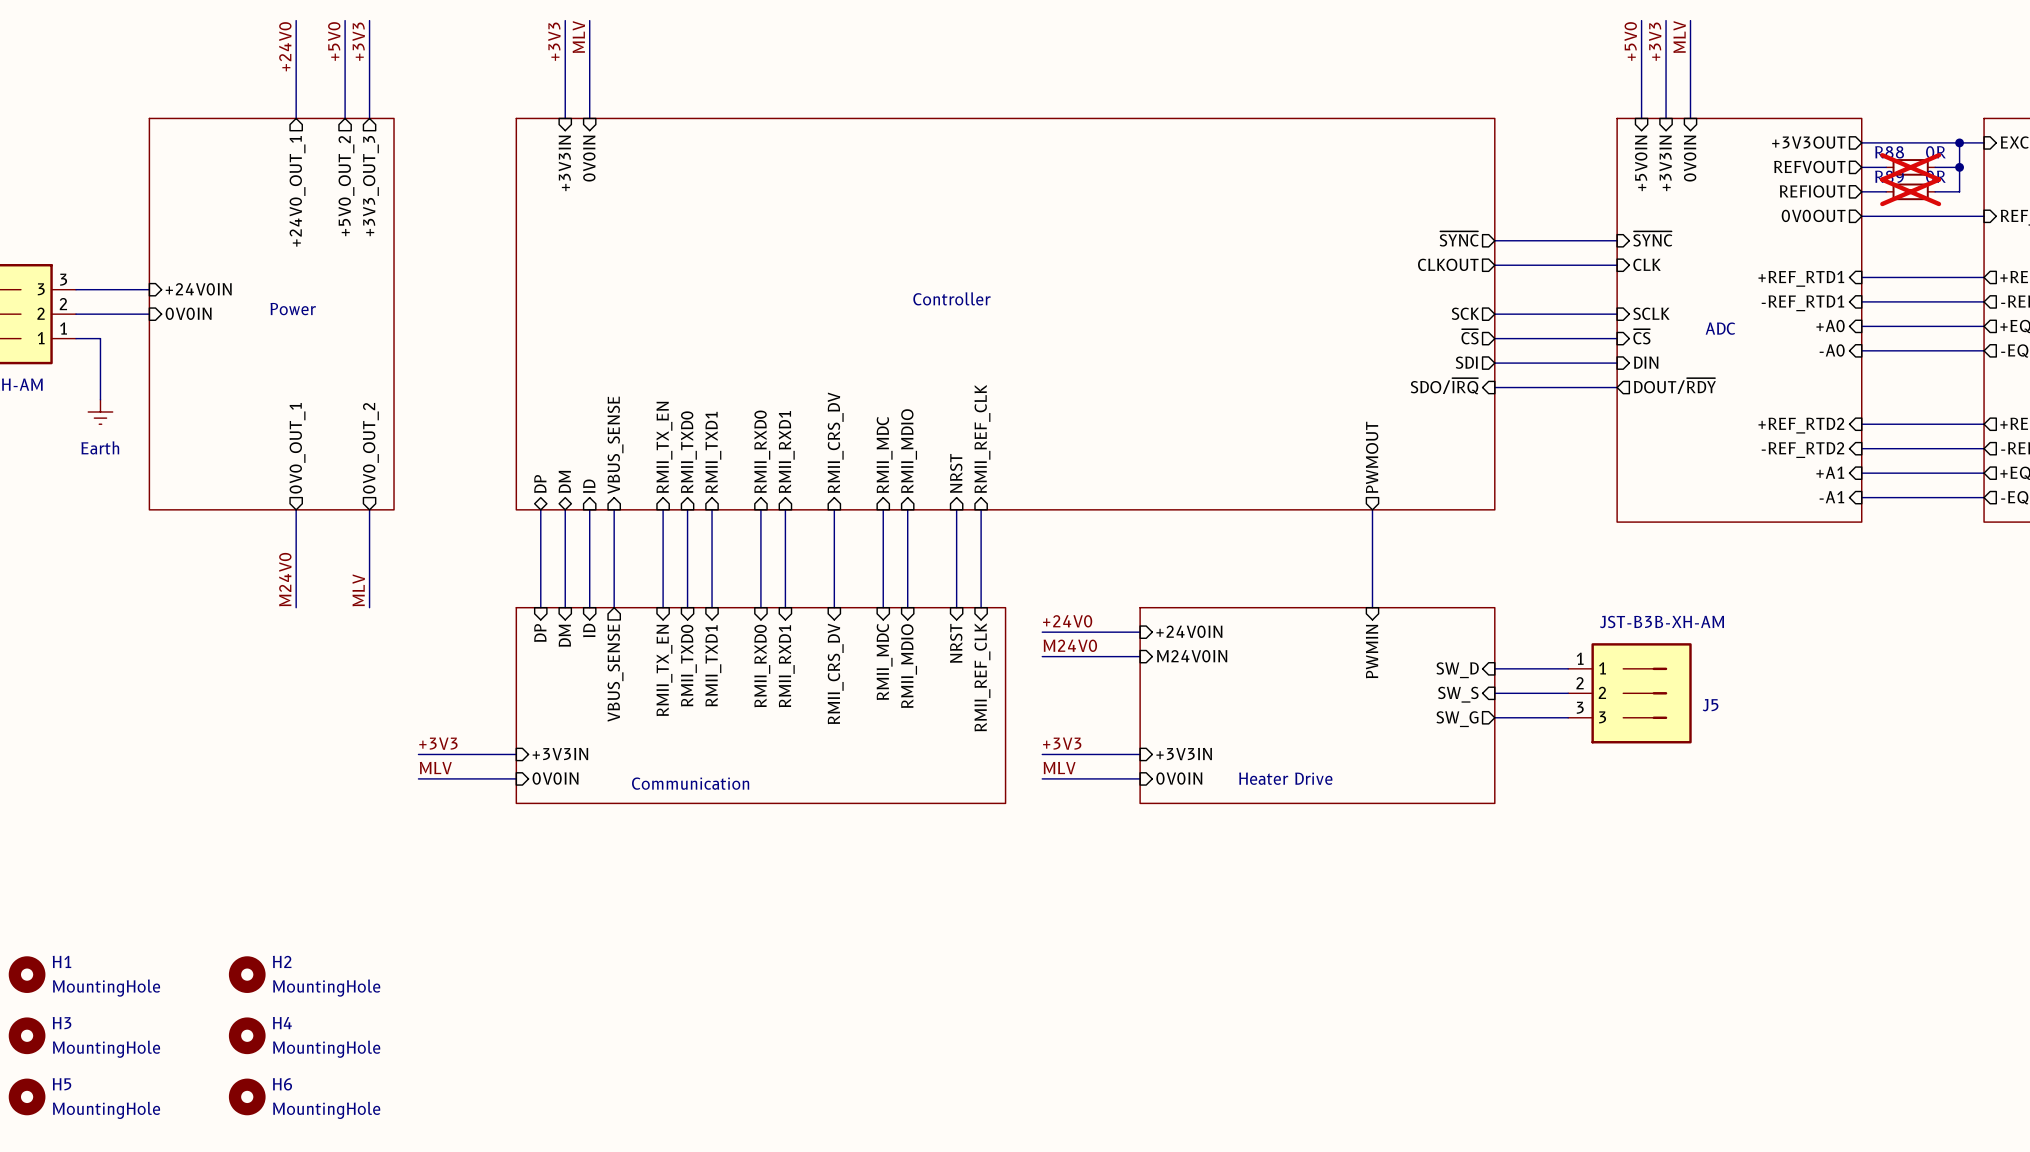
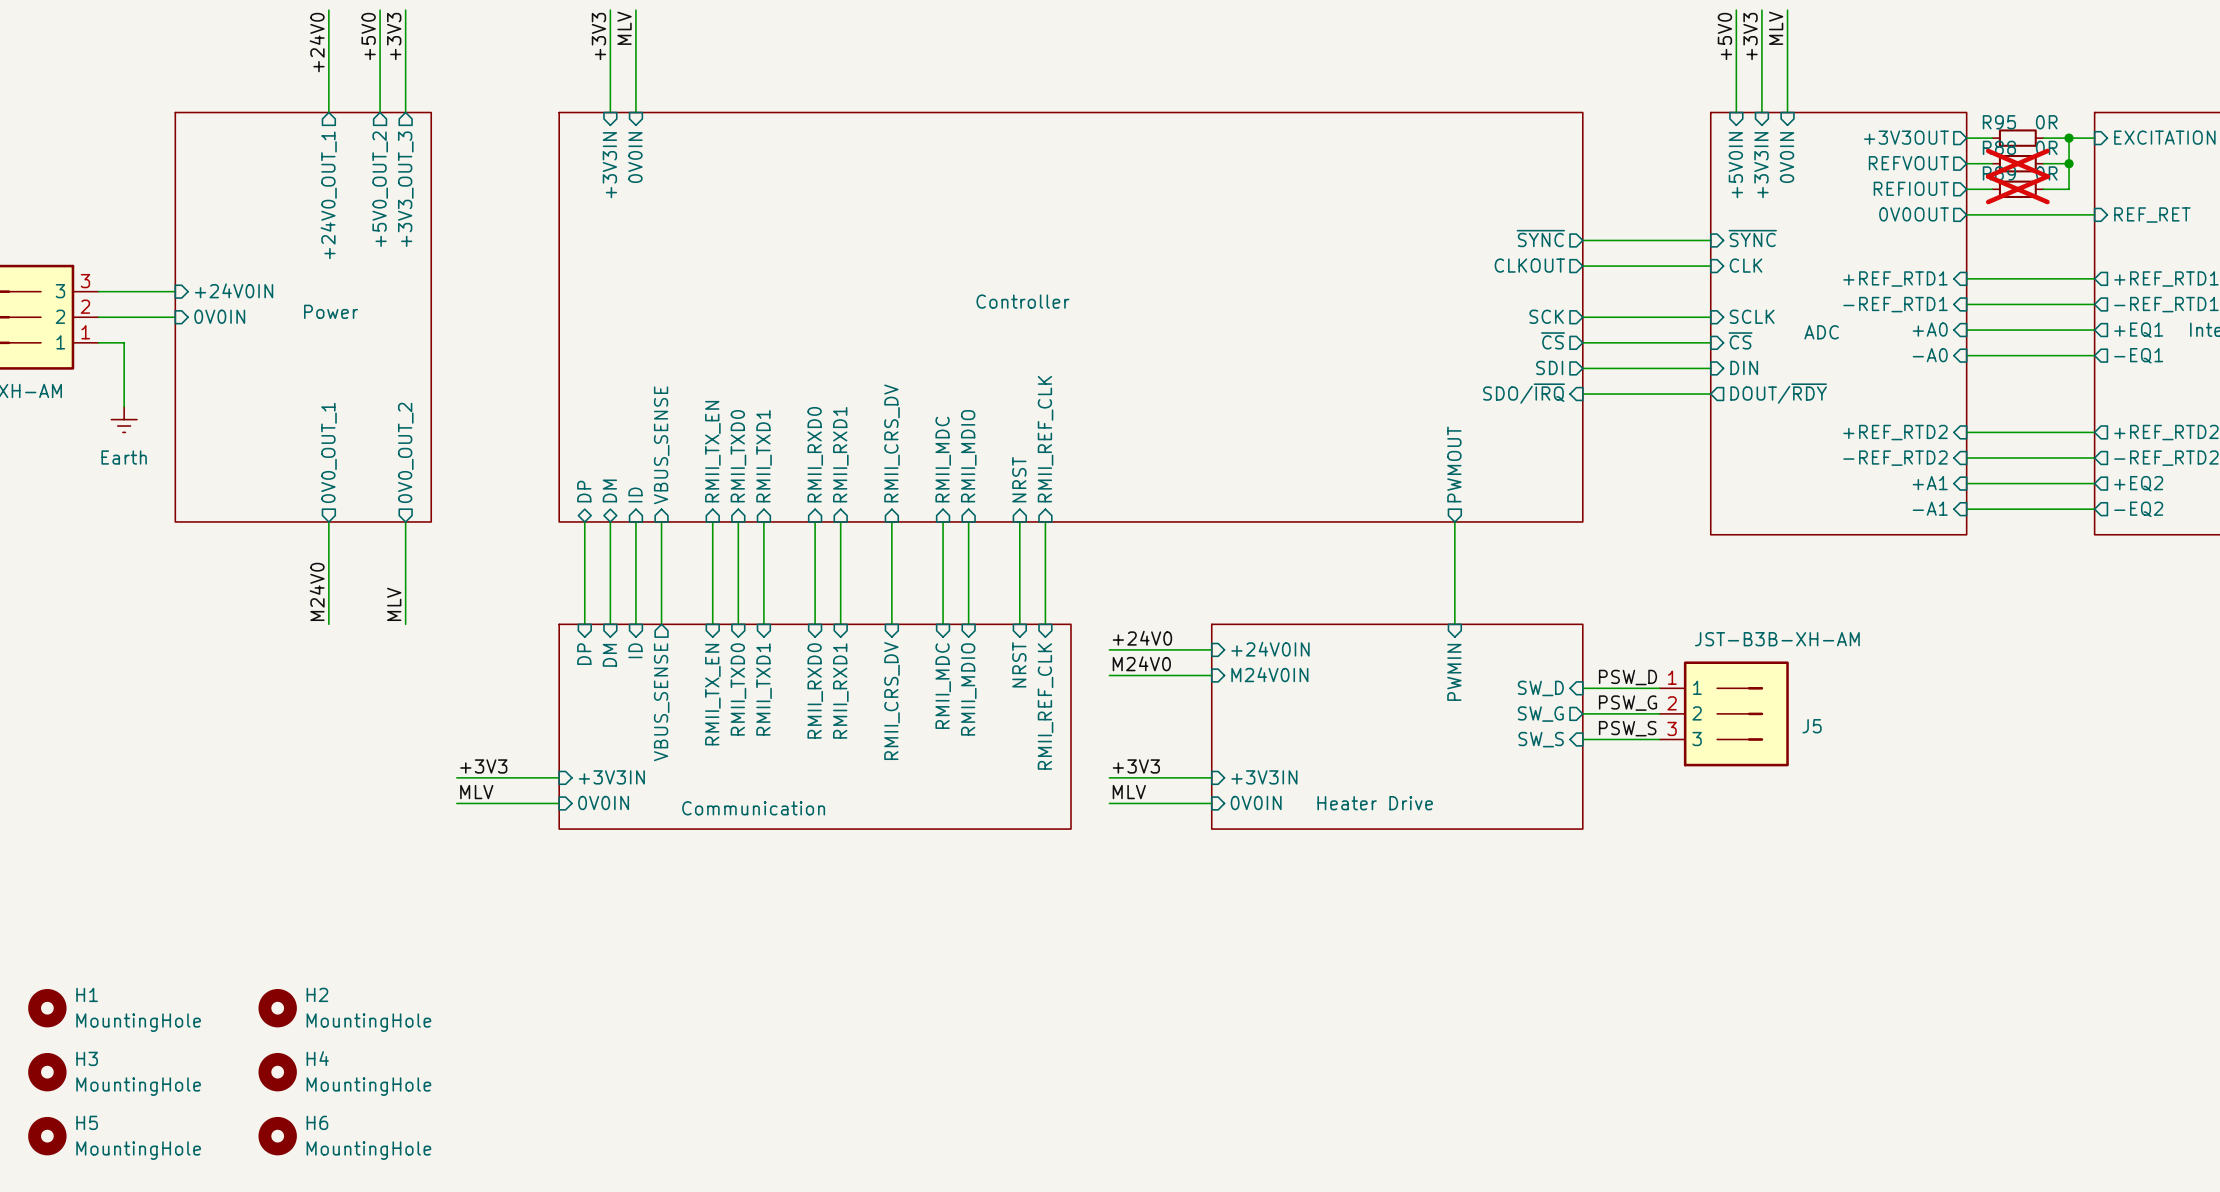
wire: (1886, 142) (1935, 142) -> none
R95: none -> 0R (2017, 138)
label: none -> PSW_D (1627, 677)
label: none -> PSW_G (1627, 703)
sheet pin shape: input (1458, 694) -> output (1540, 714)
sheet pin: SW_S (1458, 694) -> SW_G (1540, 714)
label: none -> PSW_S (1627, 728)
sheet pin shape: output (1457, 719) -> input (1541, 739)
sheet pin: SW_G (1457, 719) -> SW_S (1541, 739)

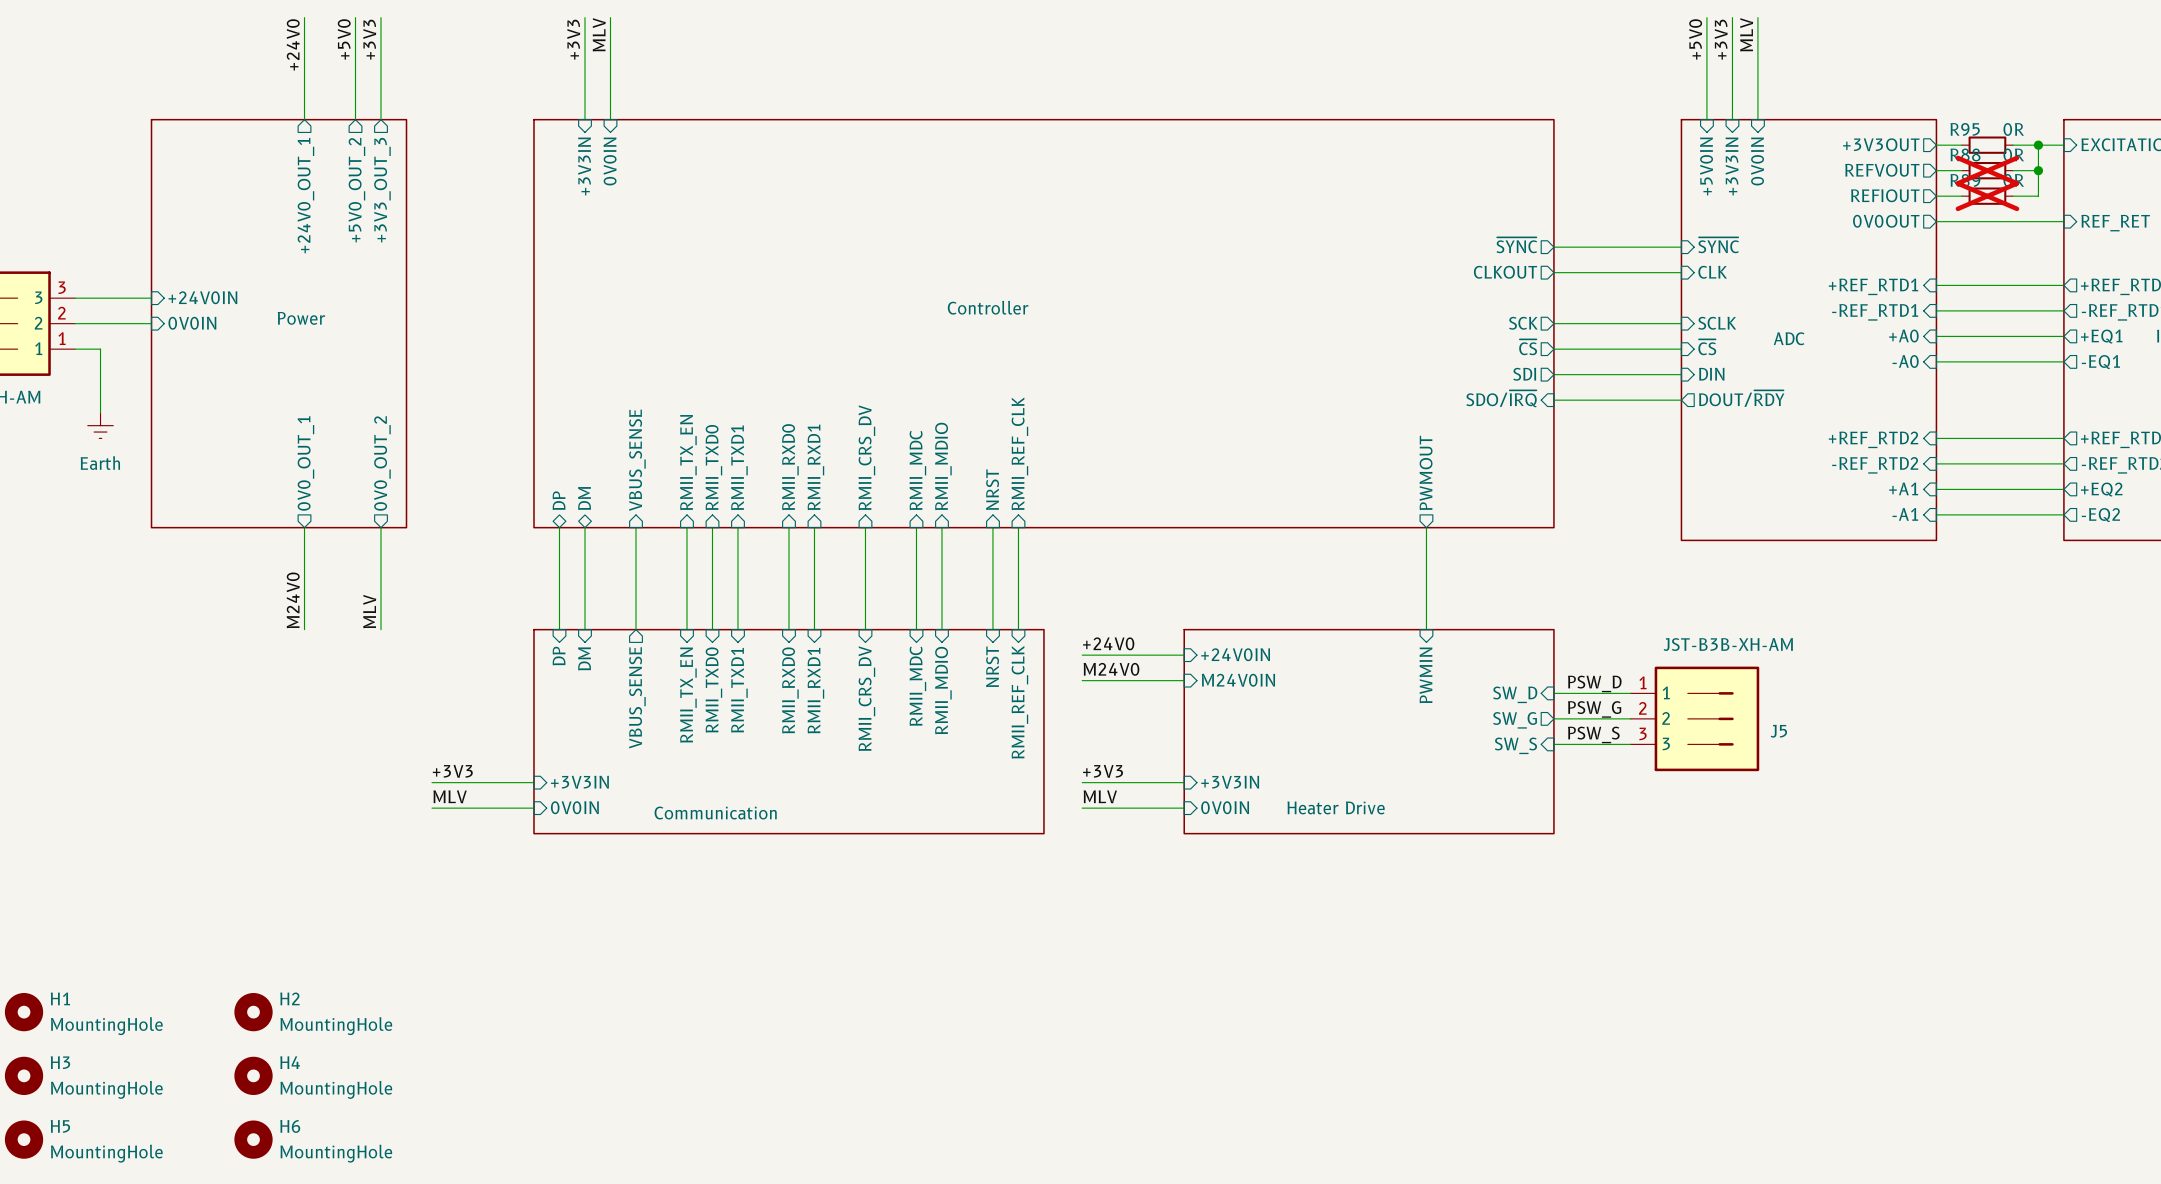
sheet pin: ID (635, 494) -> none
wire: (635, 521) (635, 624) -> none
sheet pin: ID (635, 650) -> none

